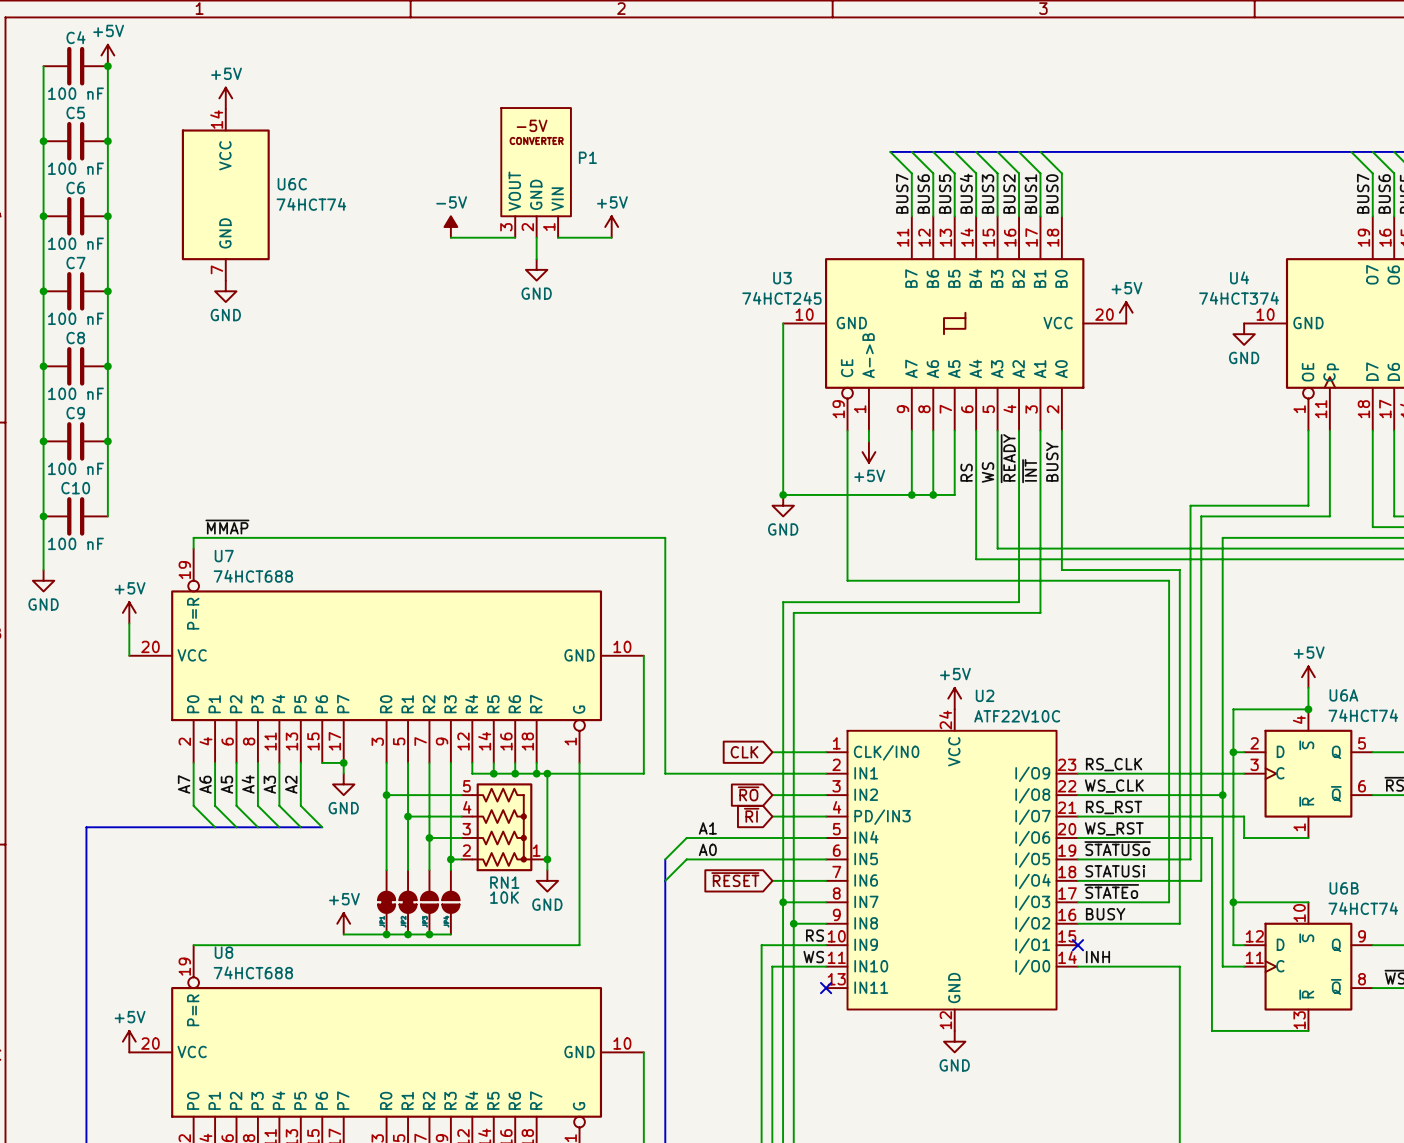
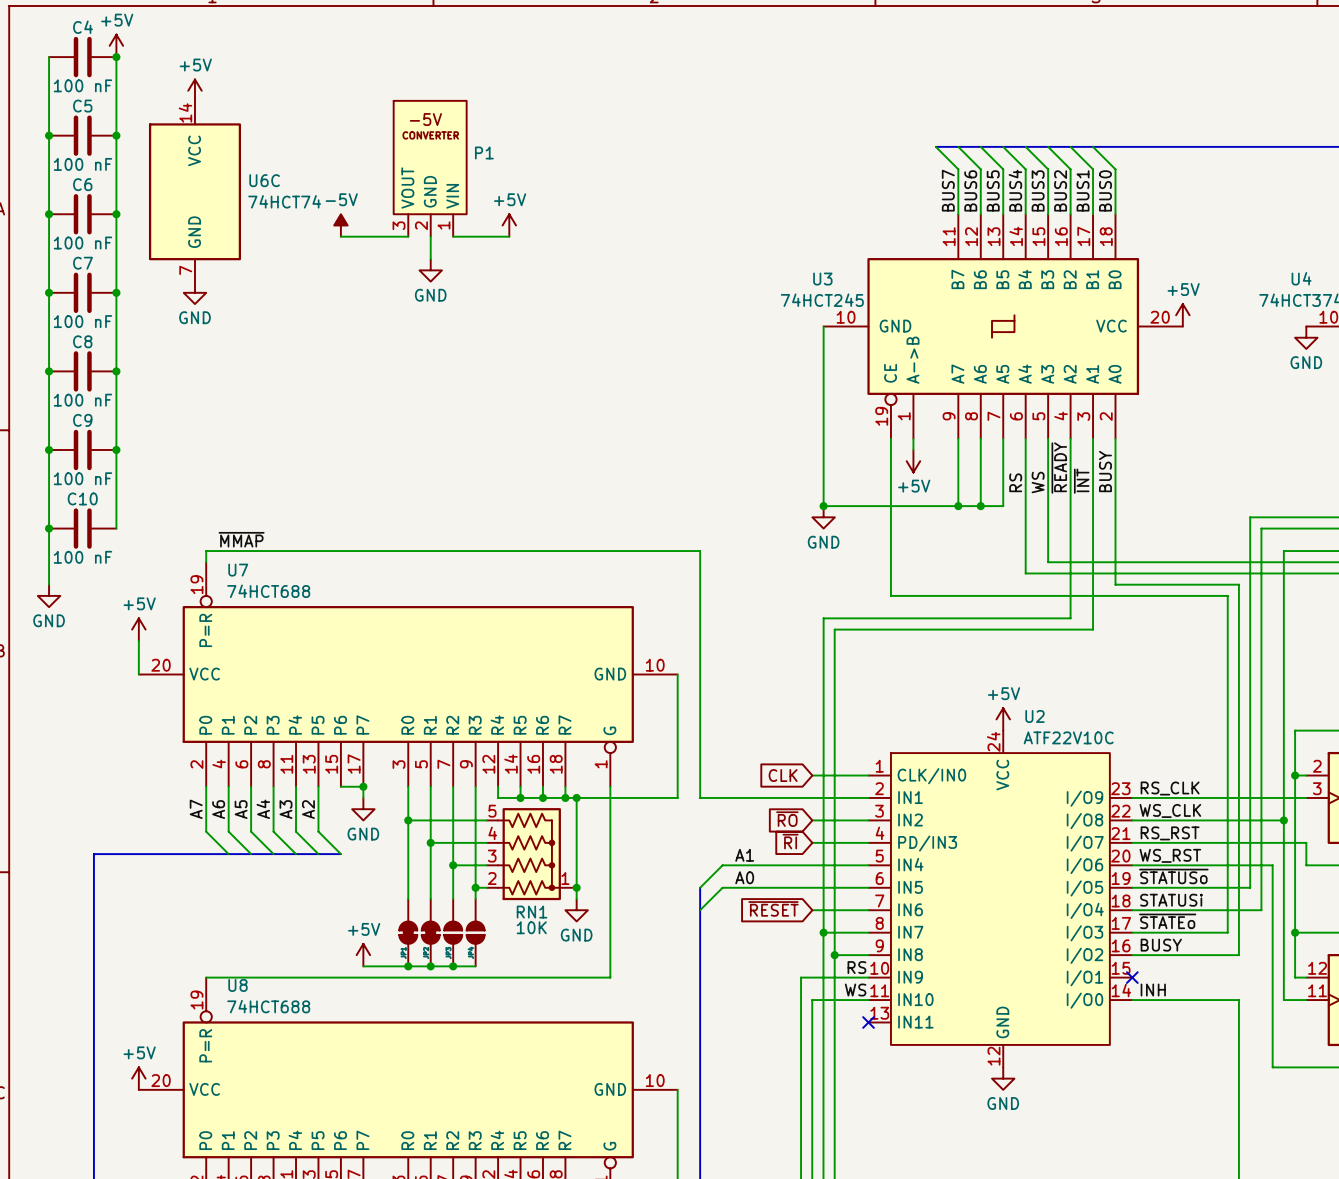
power symbol position: +5V (225, 98) -> +5V (194, 90)
P1 position: (536, 172) -> (430, 168)
U6C position: (225, 194) -> (194, 191)
power symbol position: -5V (450, 226) -> -5V (340, 225)
power symbol position: +5V (611, 226) -> +5V (509, 225)
wire: none -> (340, 236) (408, 236)
wire: none -> (453, 236) (475, 236)
wire: (483, 237) (515, 237) -> none
wire: (536, 237) (536, 259) -> (430, 236) (430, 259)
wire: (558, 237) (611, 237) -> none
power symbol: none -> GND (430, 270)
power symbol: GND (536, 269) -> none
power symbol position: GND (225, 291) -> GND (194, 292)

